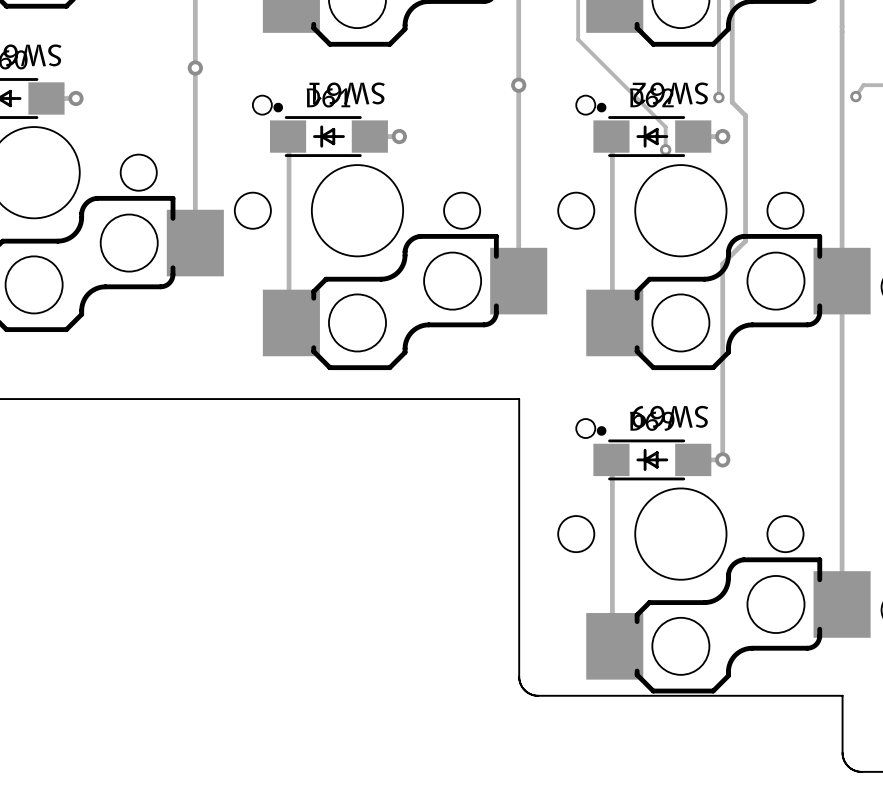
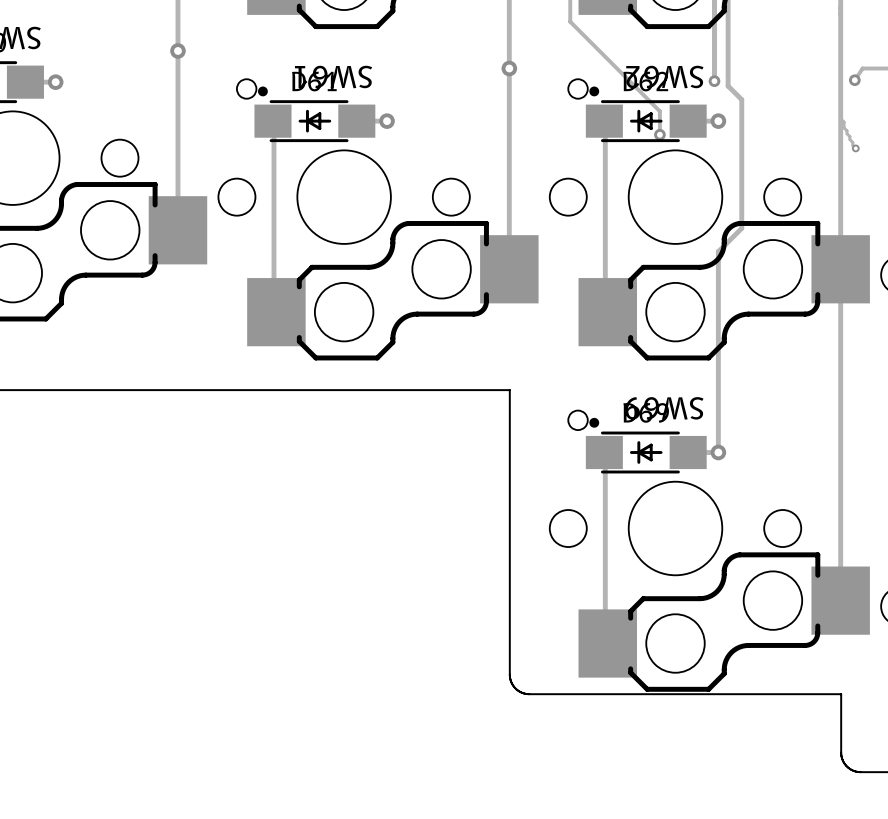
track: none -> (840, 119) (844, 122) (844, 127) (855, 148)
via: none -> (855, 148)

